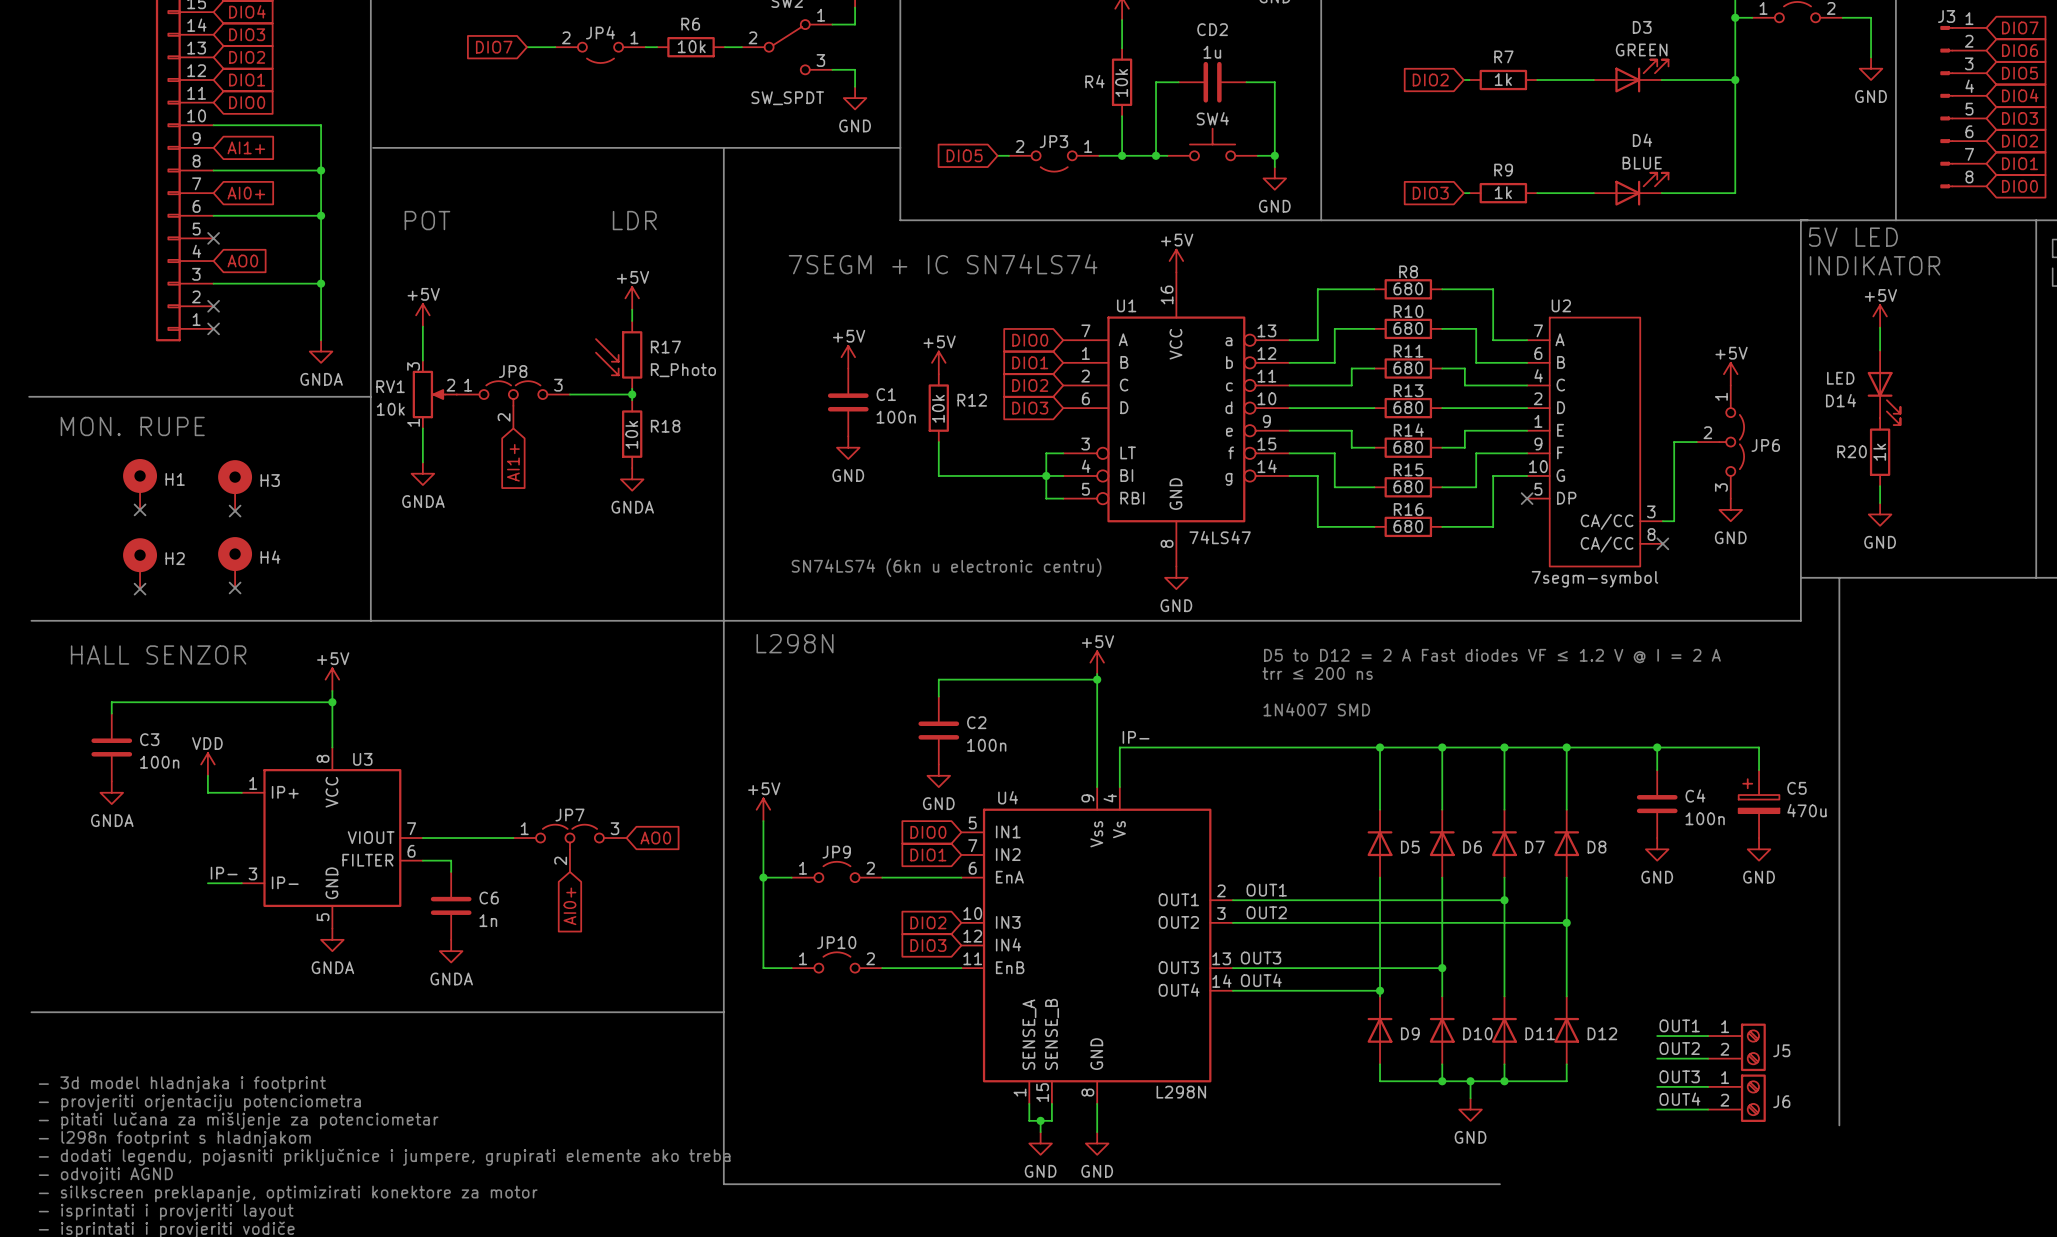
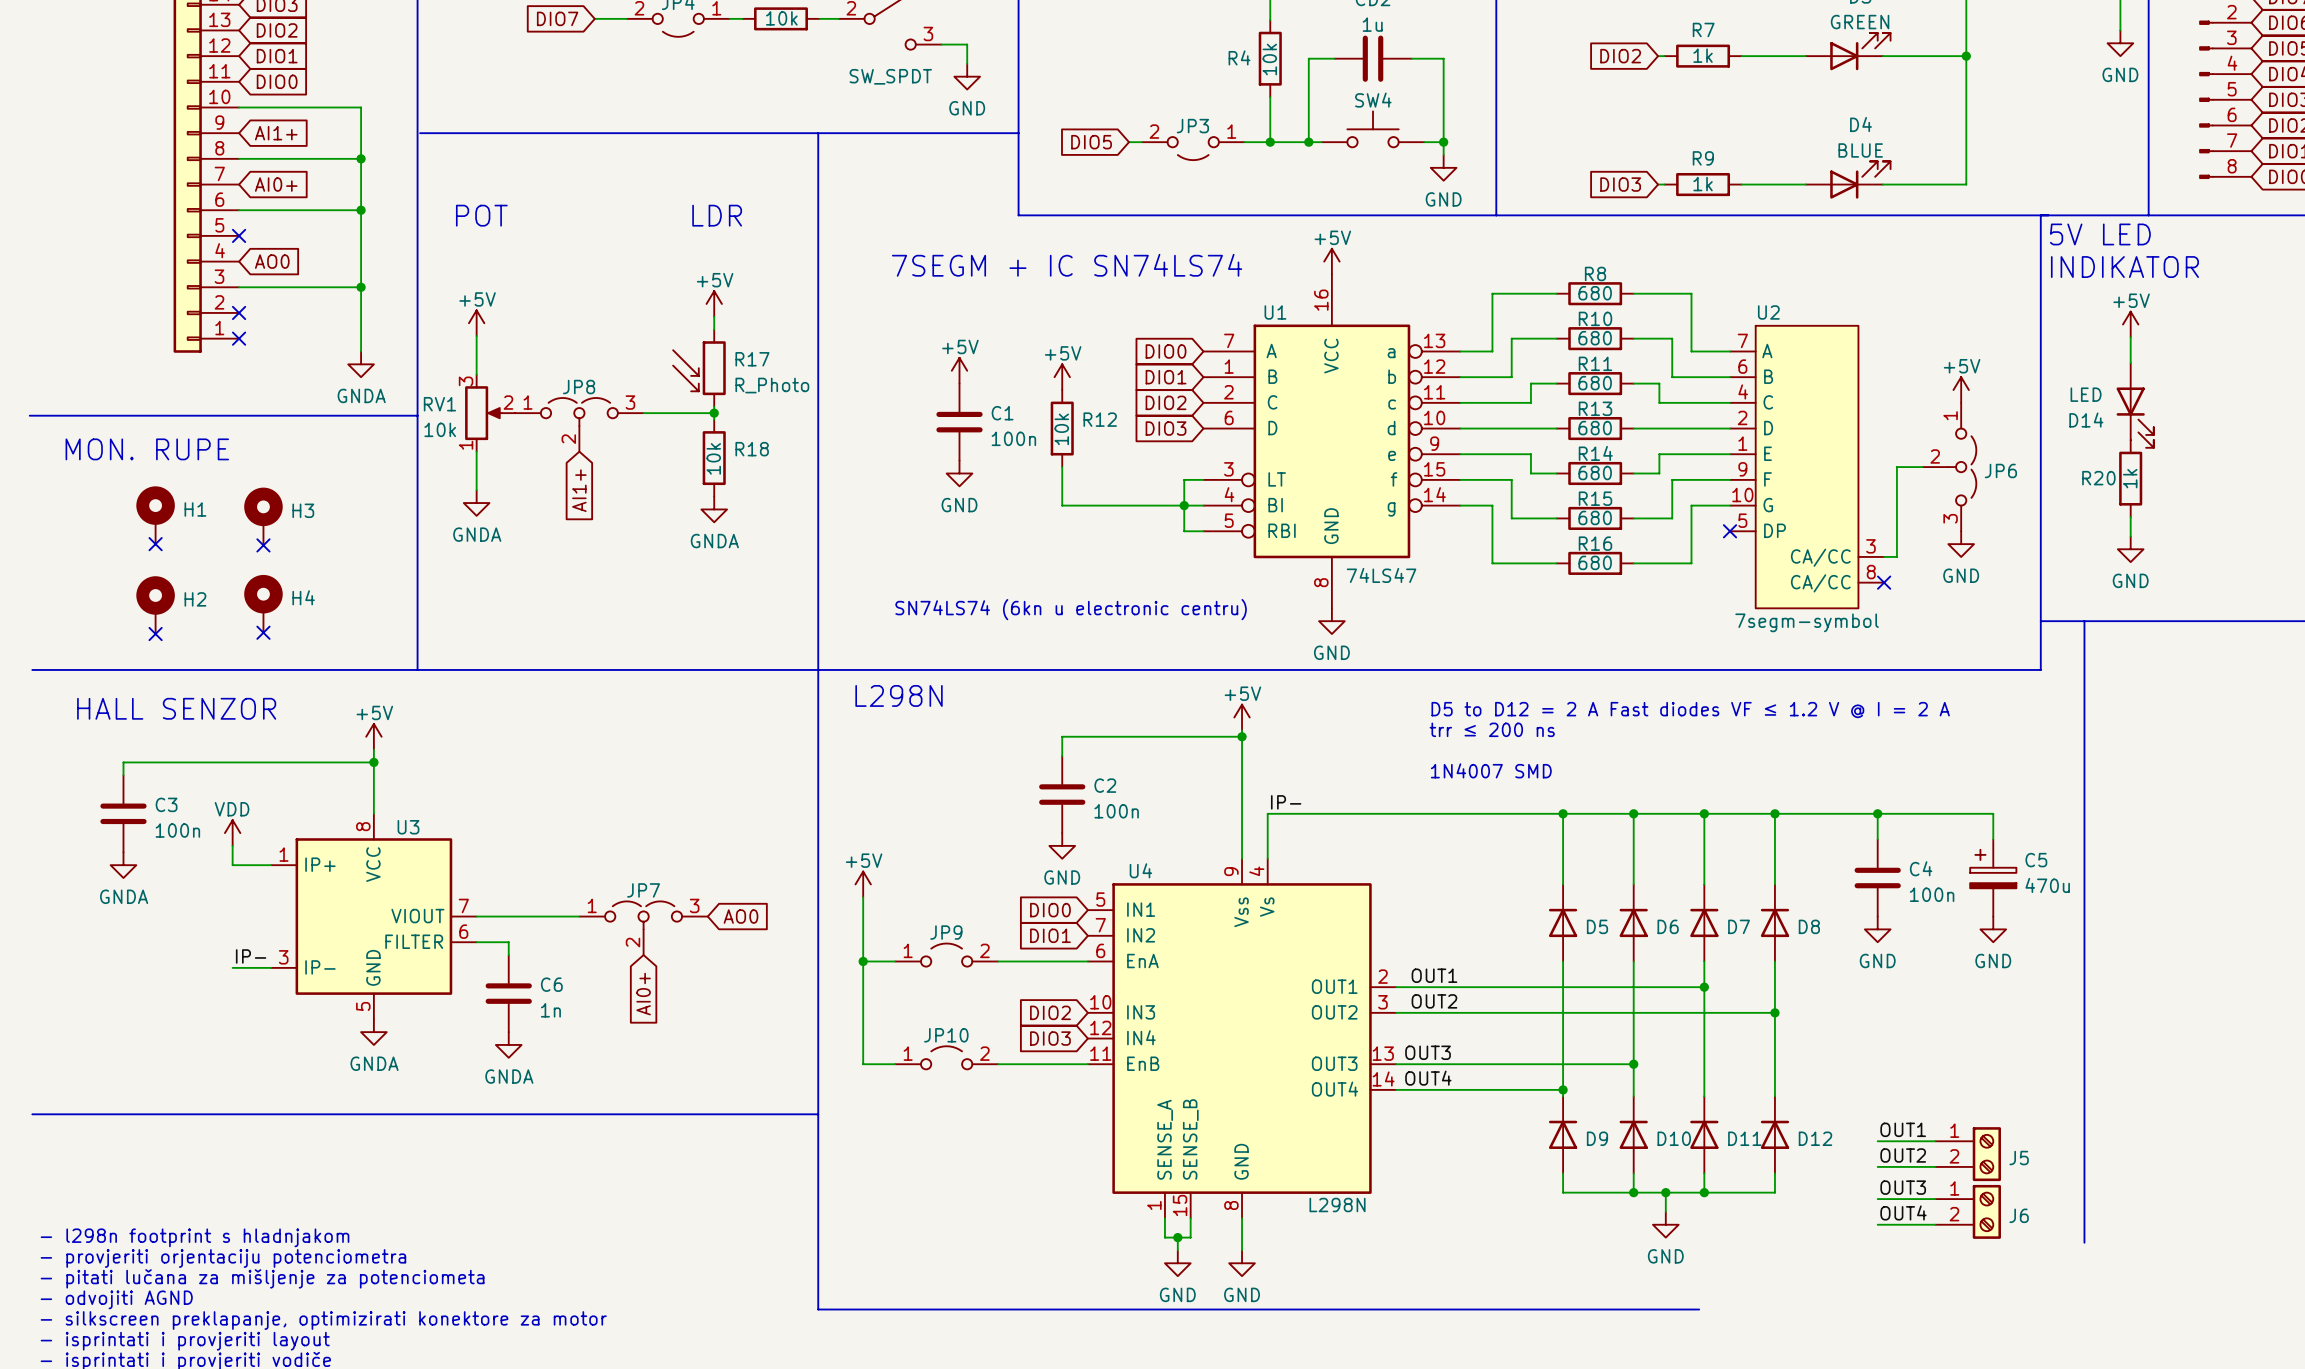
text: - 3d model hladnjaka i footprint (182, 1084) -> none
text: - provjeriti orjentaciju potenciometra (199, 1102) -> none
text: - pitati lučana za mišljenje za potenciometar (238, 1120) -> - l298n footprint s hladnjakom (195, 1237)
text: - l298n footprint s hladnjakom (174, 1139) -> - provjeriti orjentaciju potenciometra (223, 1258)
text: - dodati legendu, pojasniti priključnice i jumpere, grupirati elemente ako treba (384, 1157) -> - pitati lučana za mišljenje za potenciometa (262, 1278)

